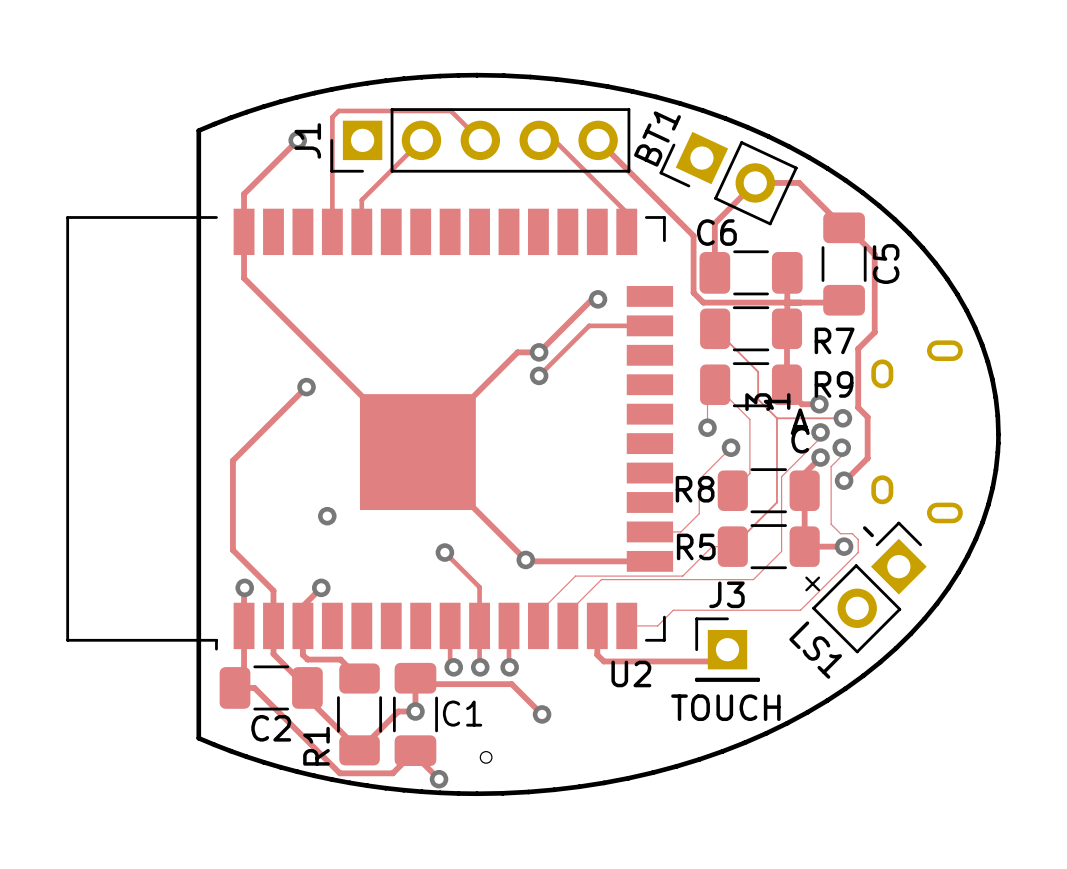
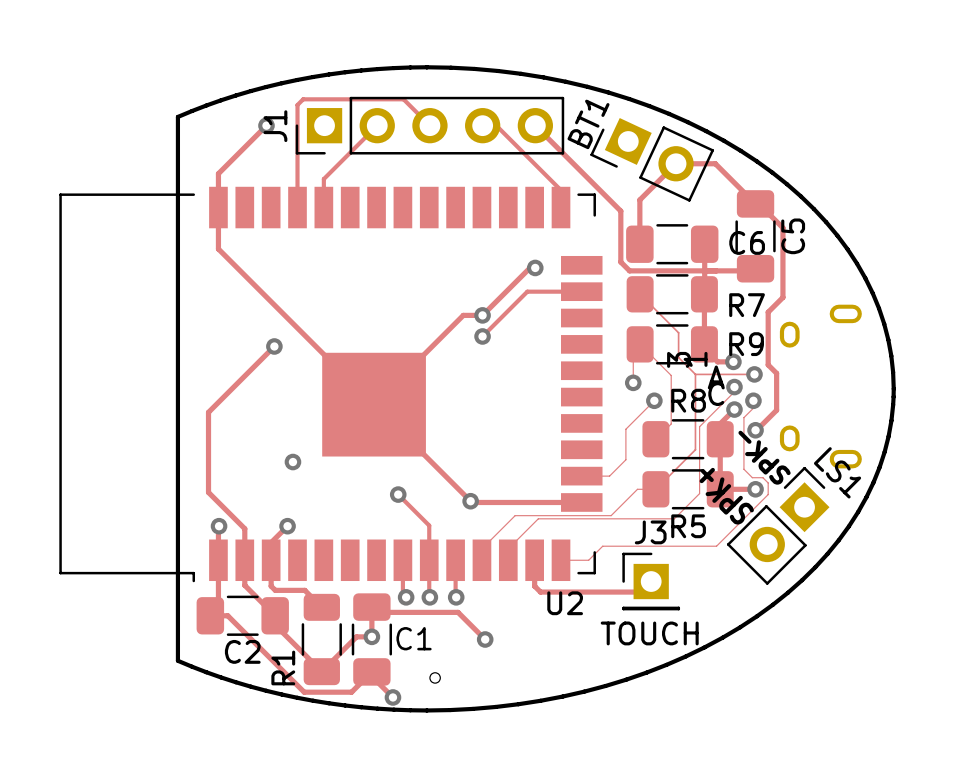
C6 name position: C6 (716, 232) -> C6 (747, 242)
R8 name position: R8 (695, 489) -> R8 (688, 400)
text: none -> SPK- (764, 457)
text: - (868, 531) -> none
R5 name position: R5 (696, 546) -> R5 (688, 526)
text: none -> SPK+ (726, 496)
text: + (812, 583) -> none
LS1 name position: LS1 (815, 650) -> LS1 (837, 472)

